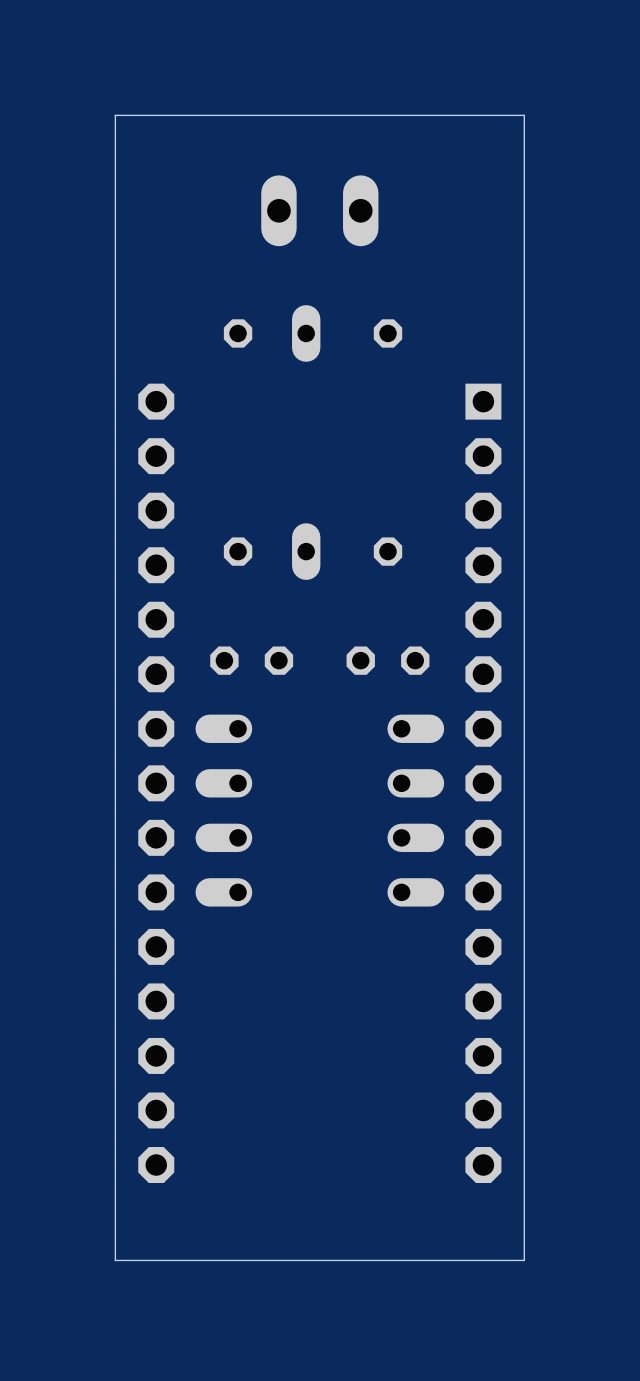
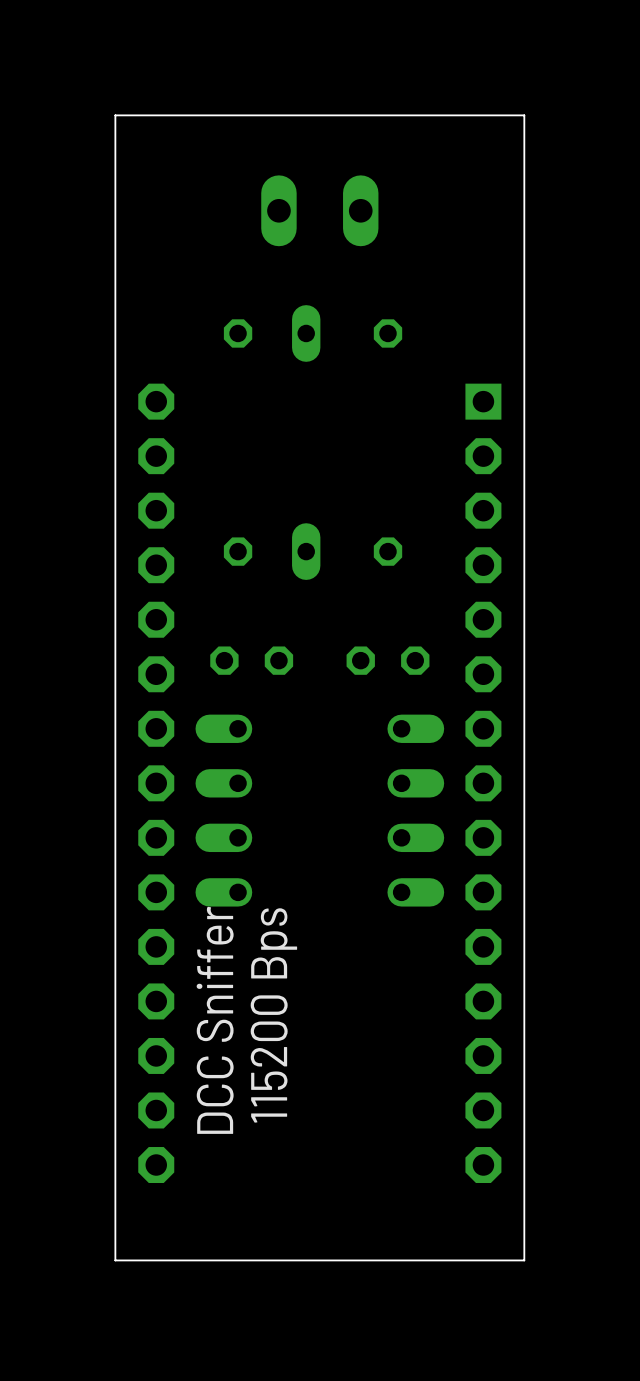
text: none -> DCC Sniffer (215, 1020)
text: none -> 115200 Bps (273, 1015)

